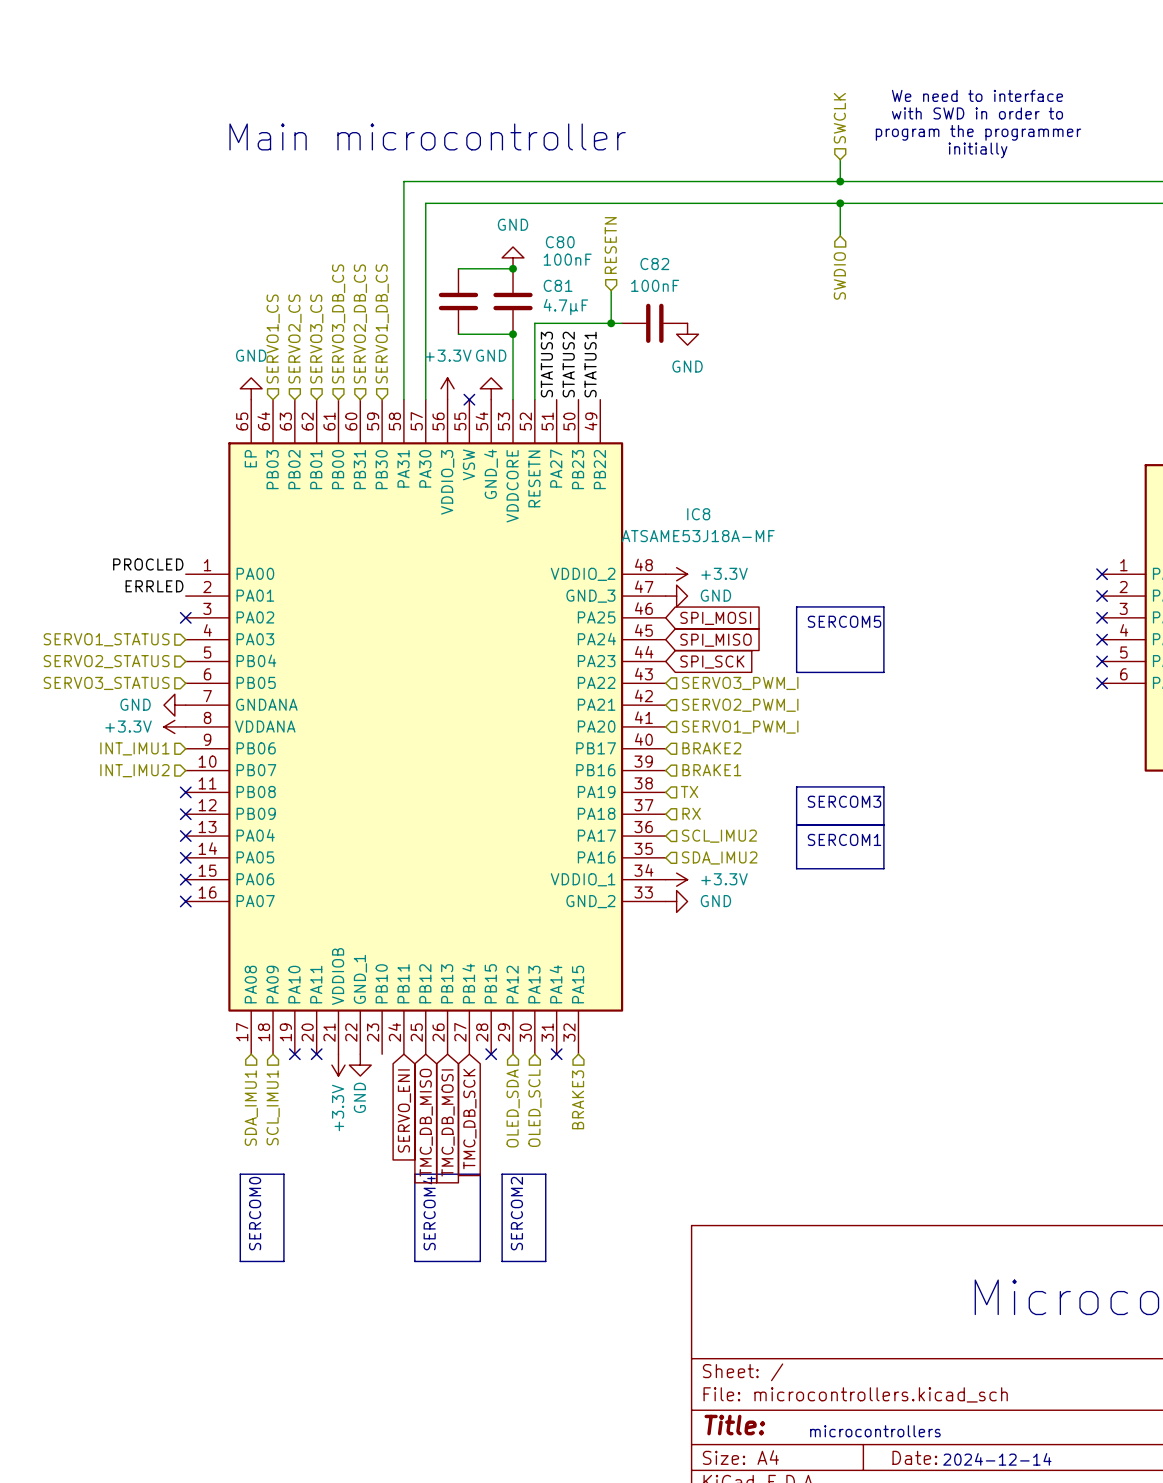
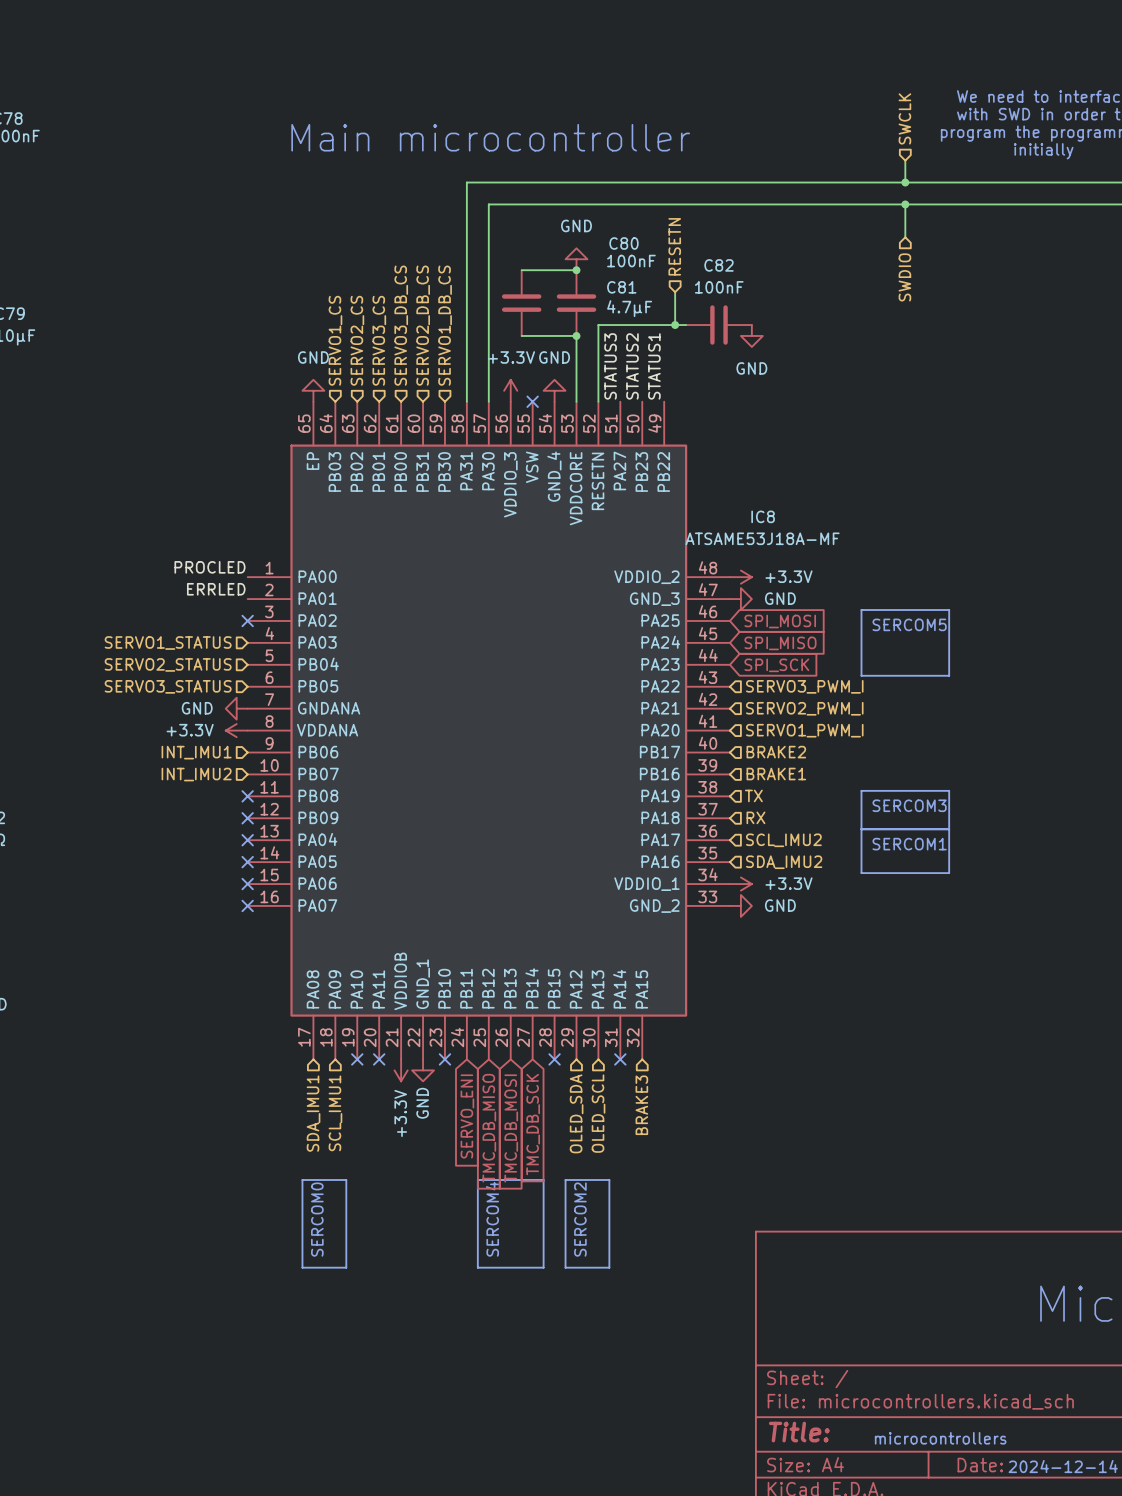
no-connect mark: none -> (444, 1059)

